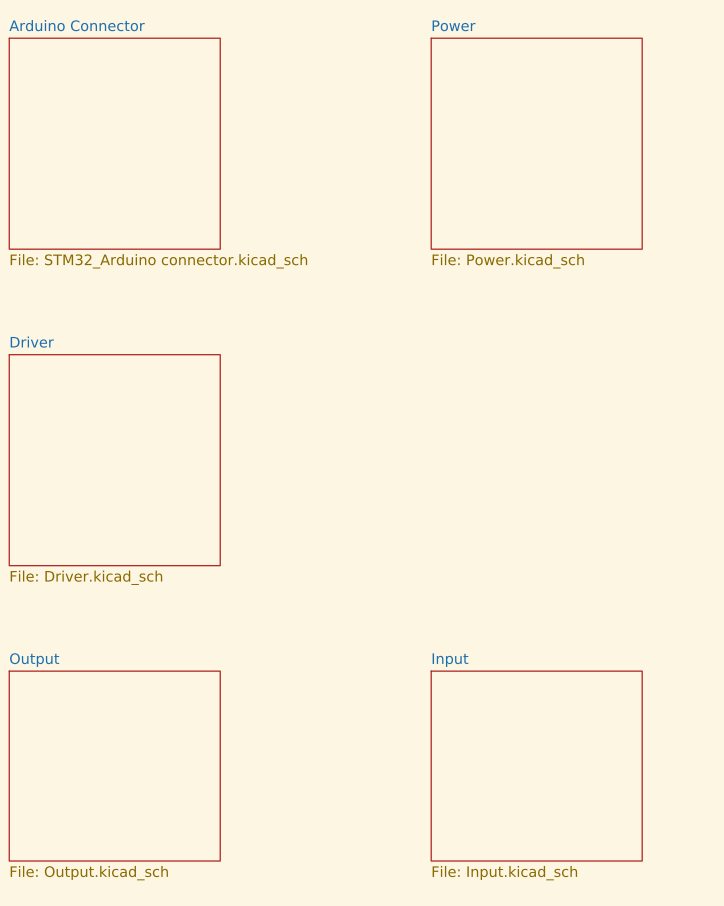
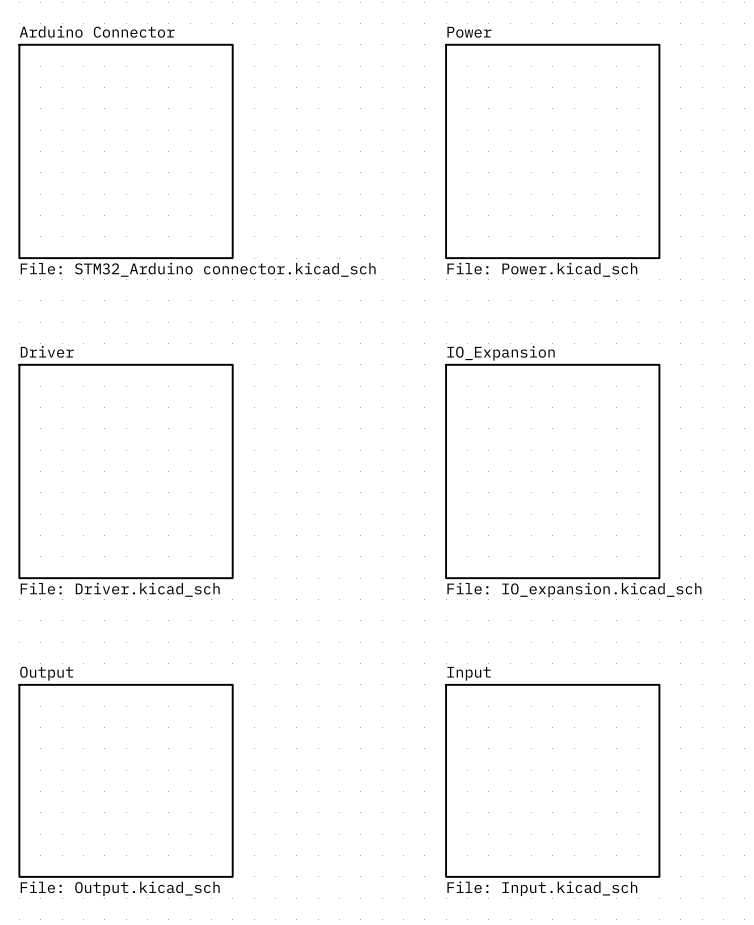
sheet IO_Expansion: none -> File: IO_expansion.kicad_sch (552, 471)

